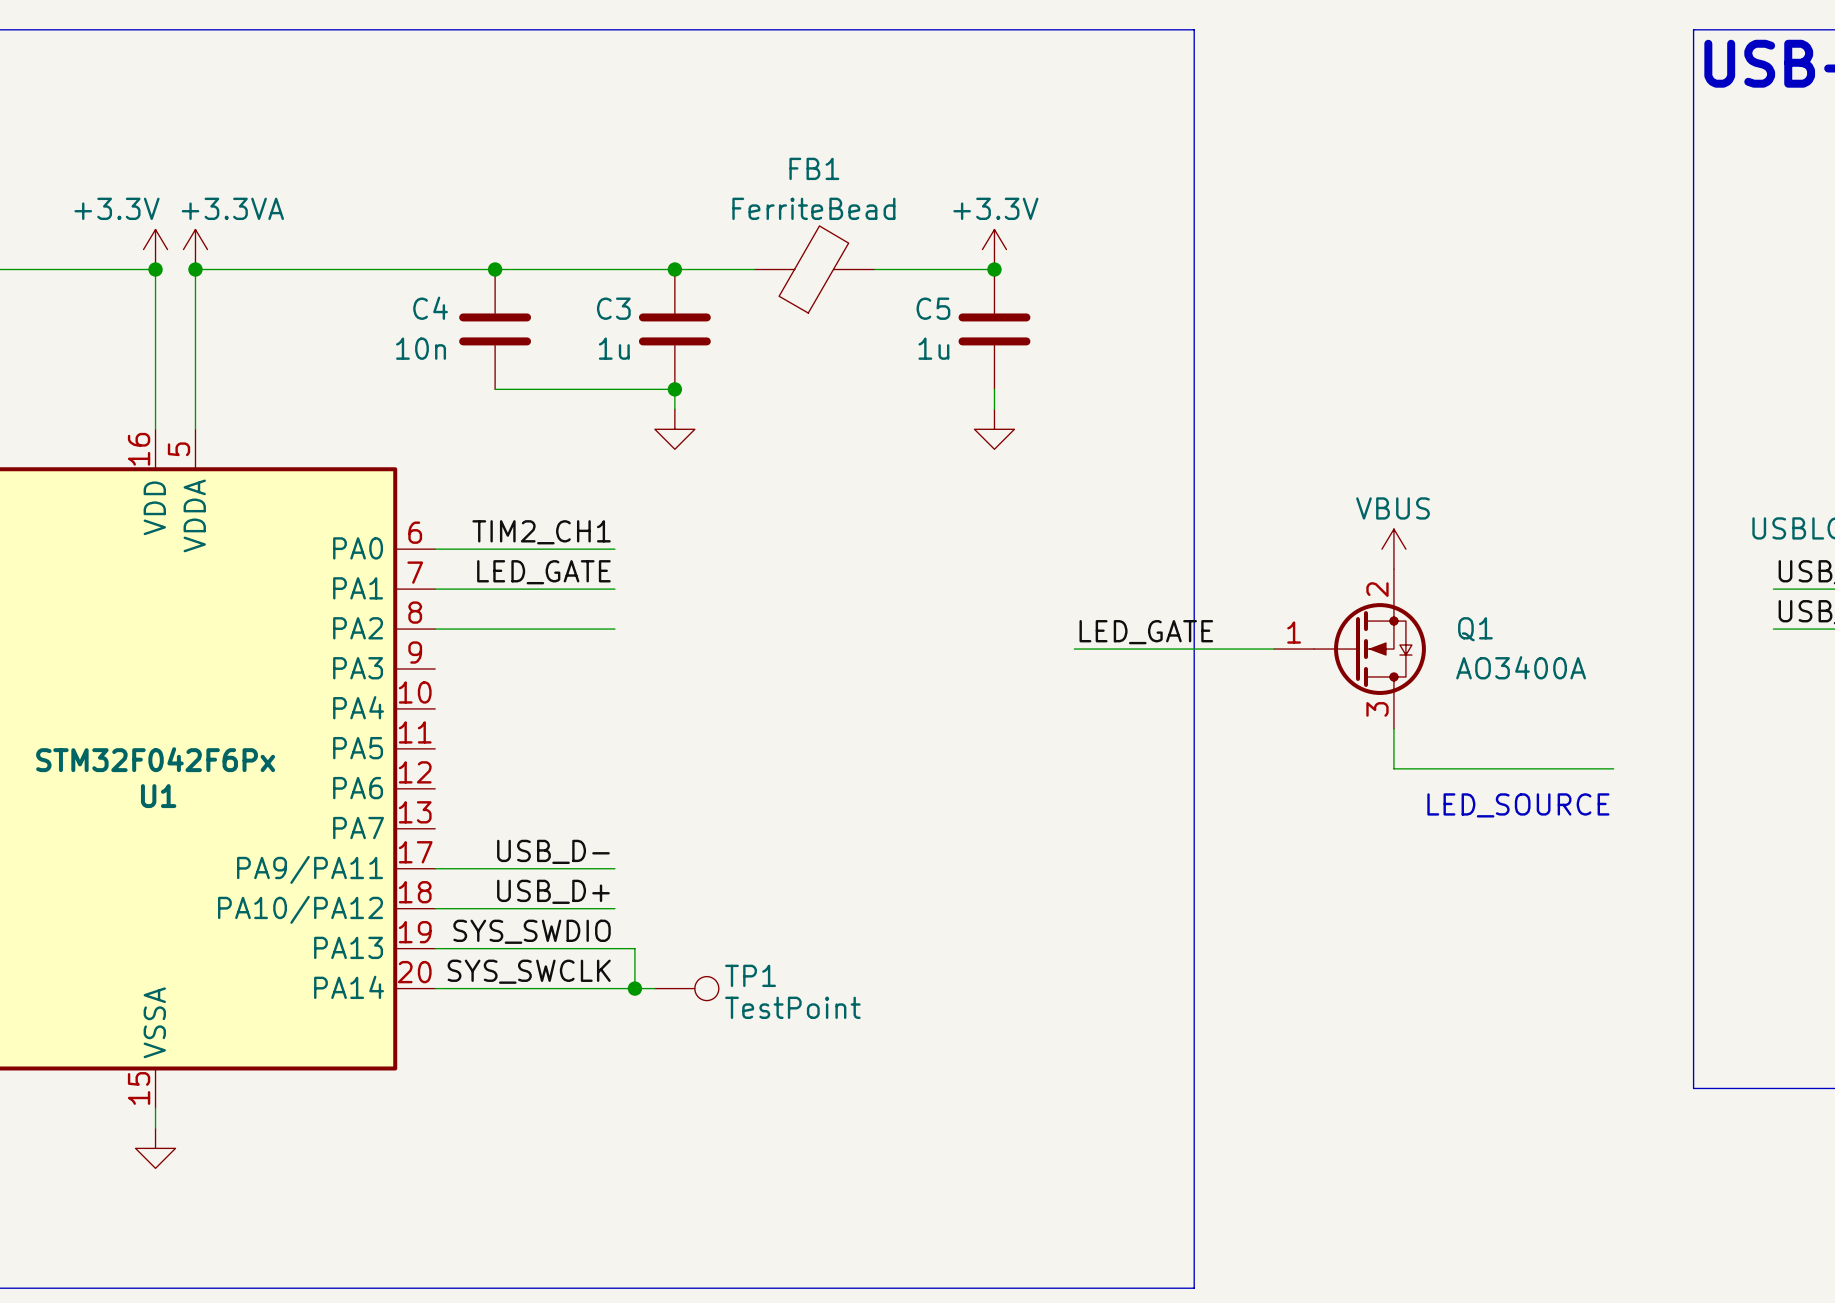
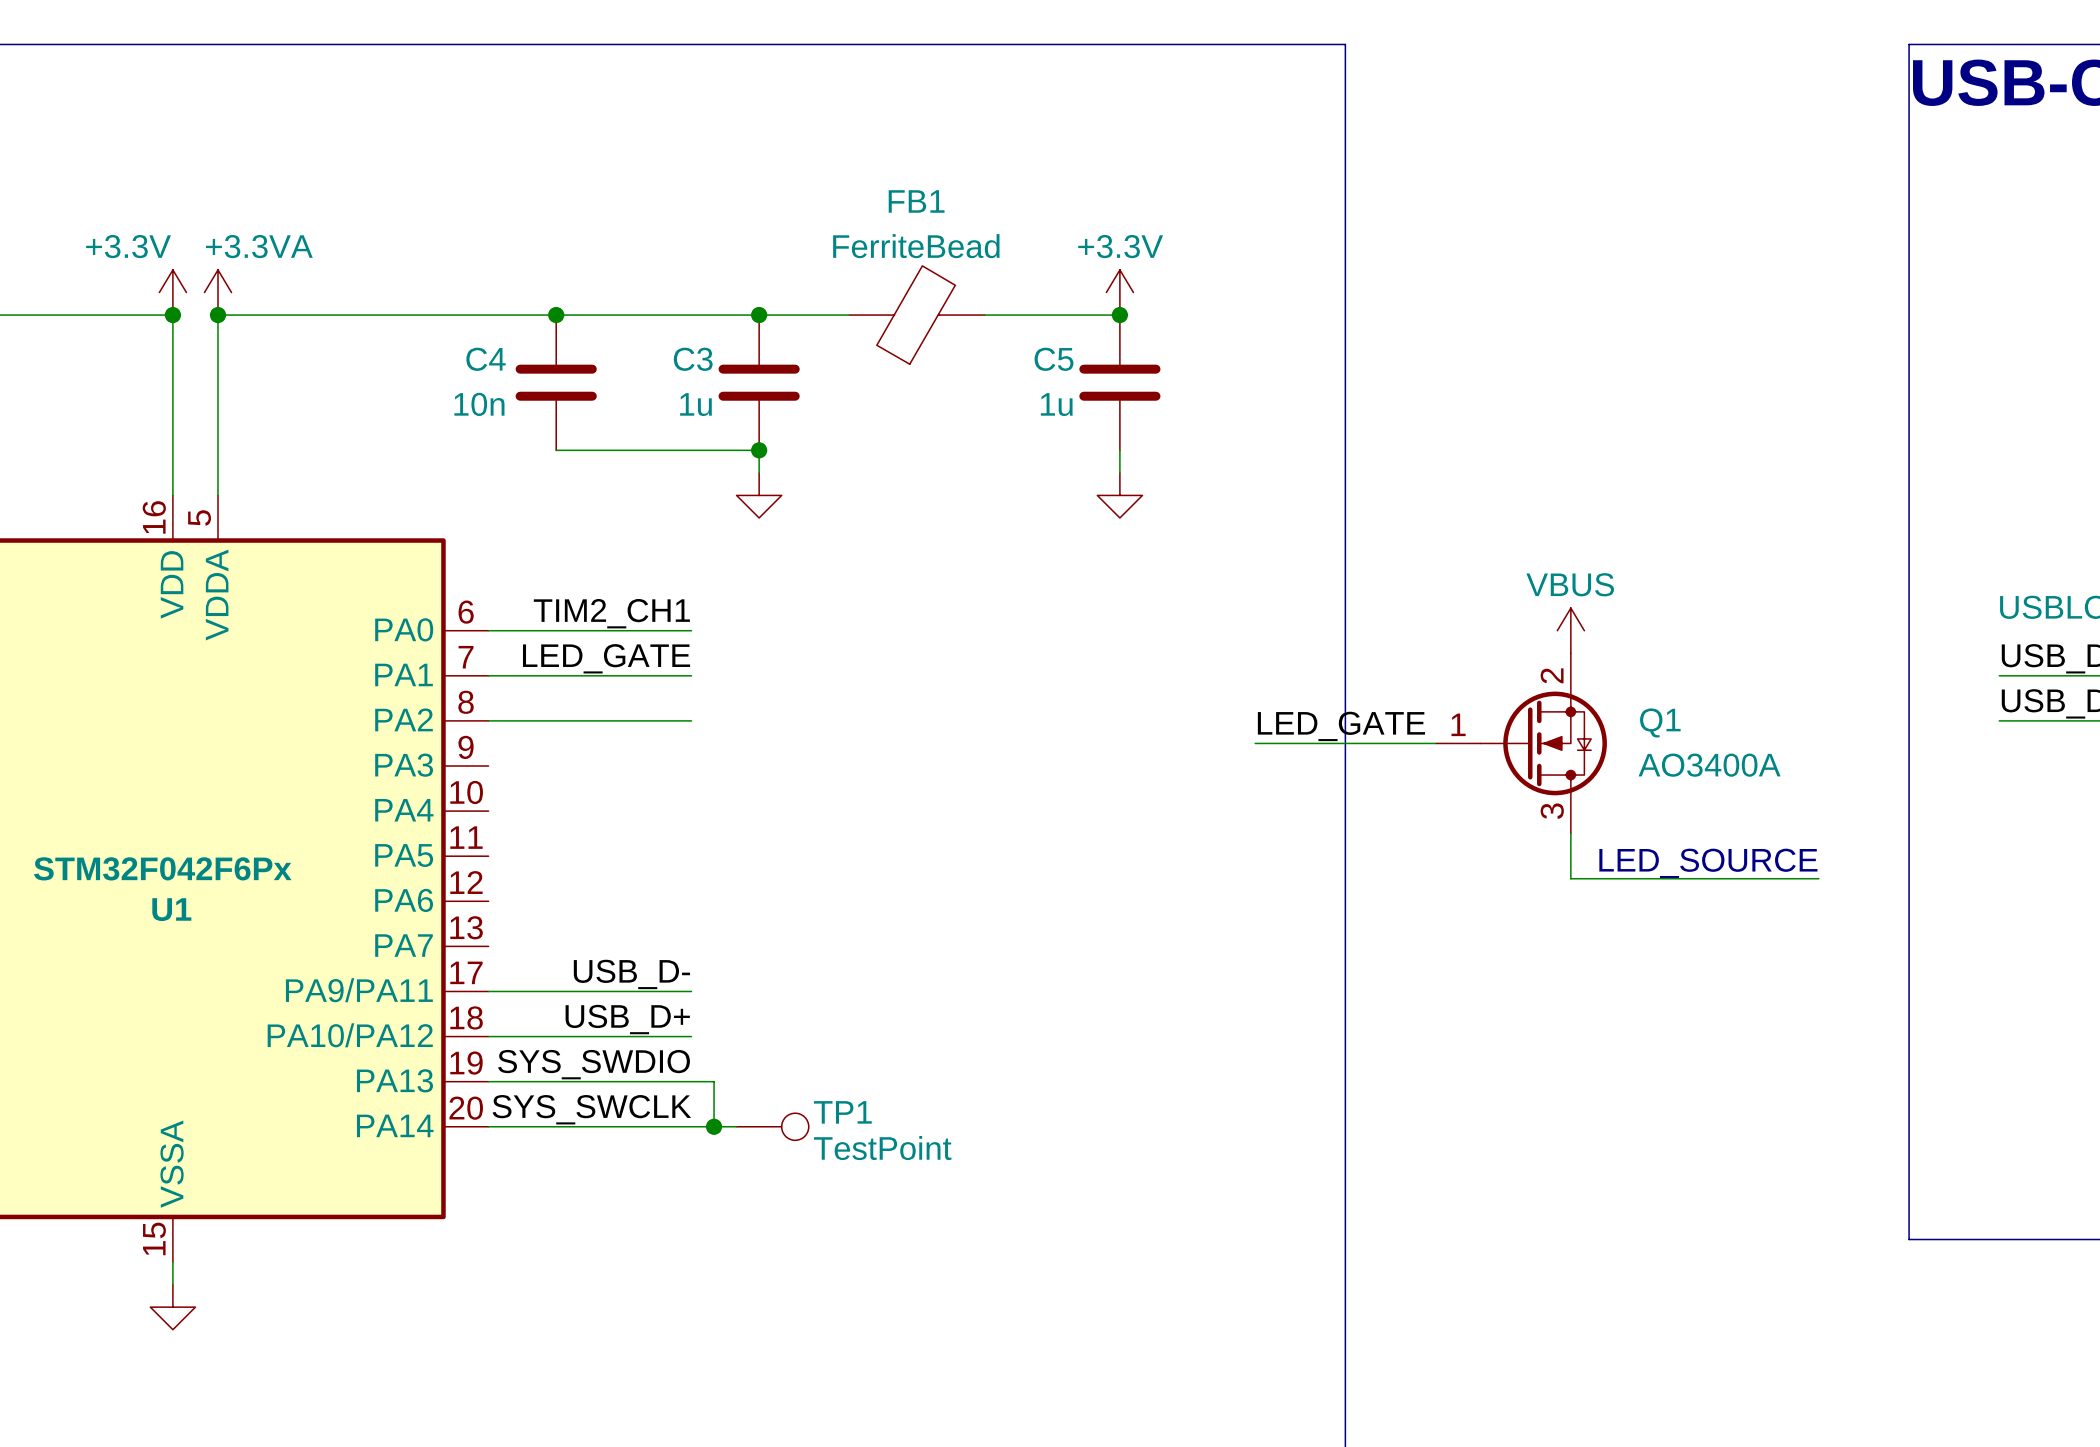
label position: LED_GATE (1146, 632) -> LED_GATE (1341, 726)
wire: (1074, 649) (1114, 649) -> none
text position: LED_SOURCE (1518, 805) -> LED_SOURCE (1708, 863)

